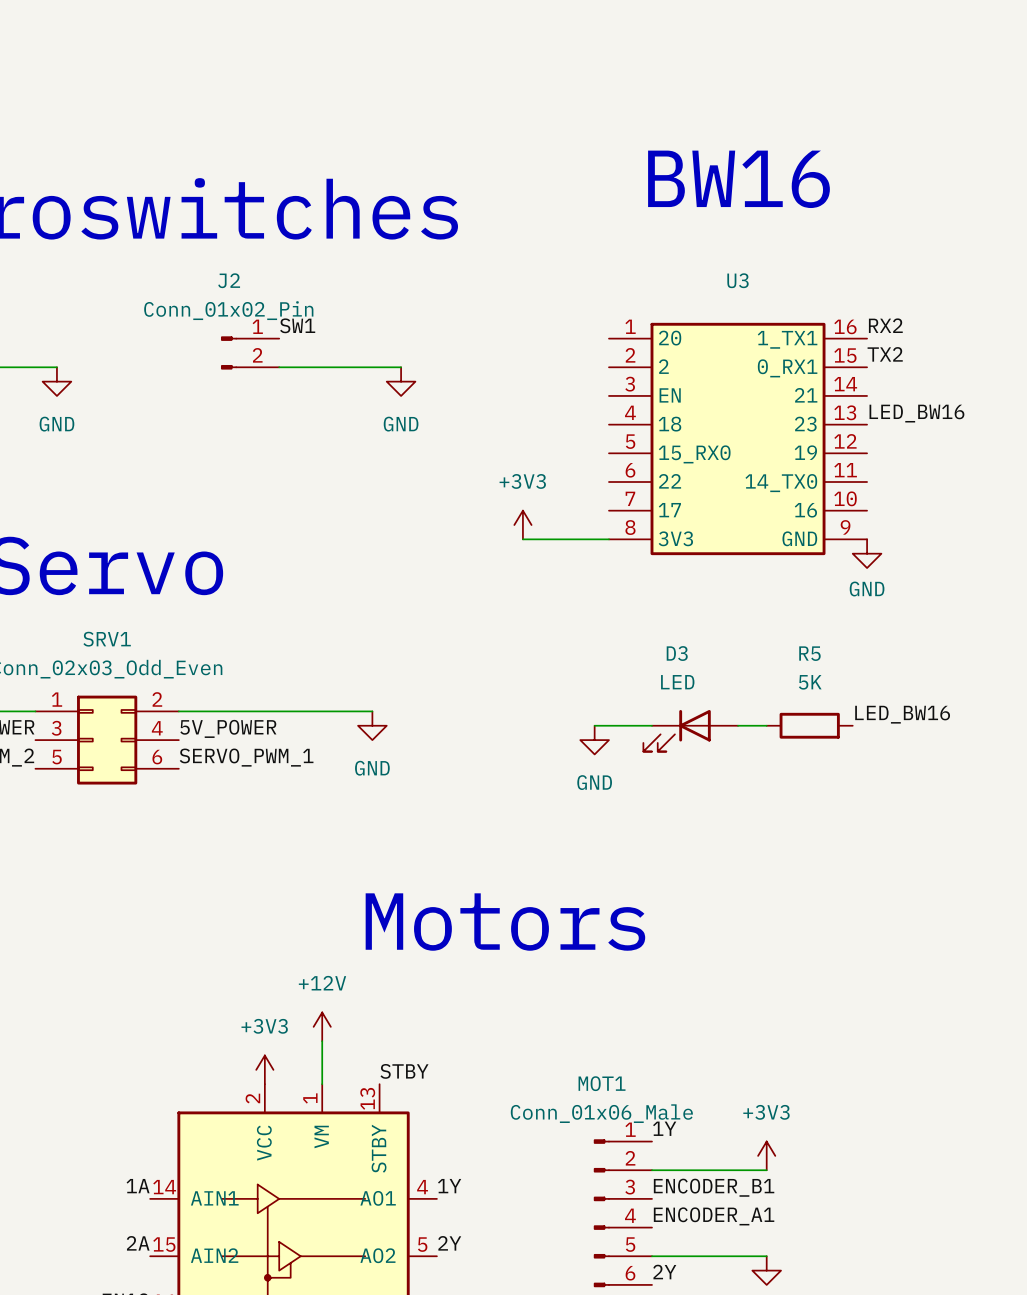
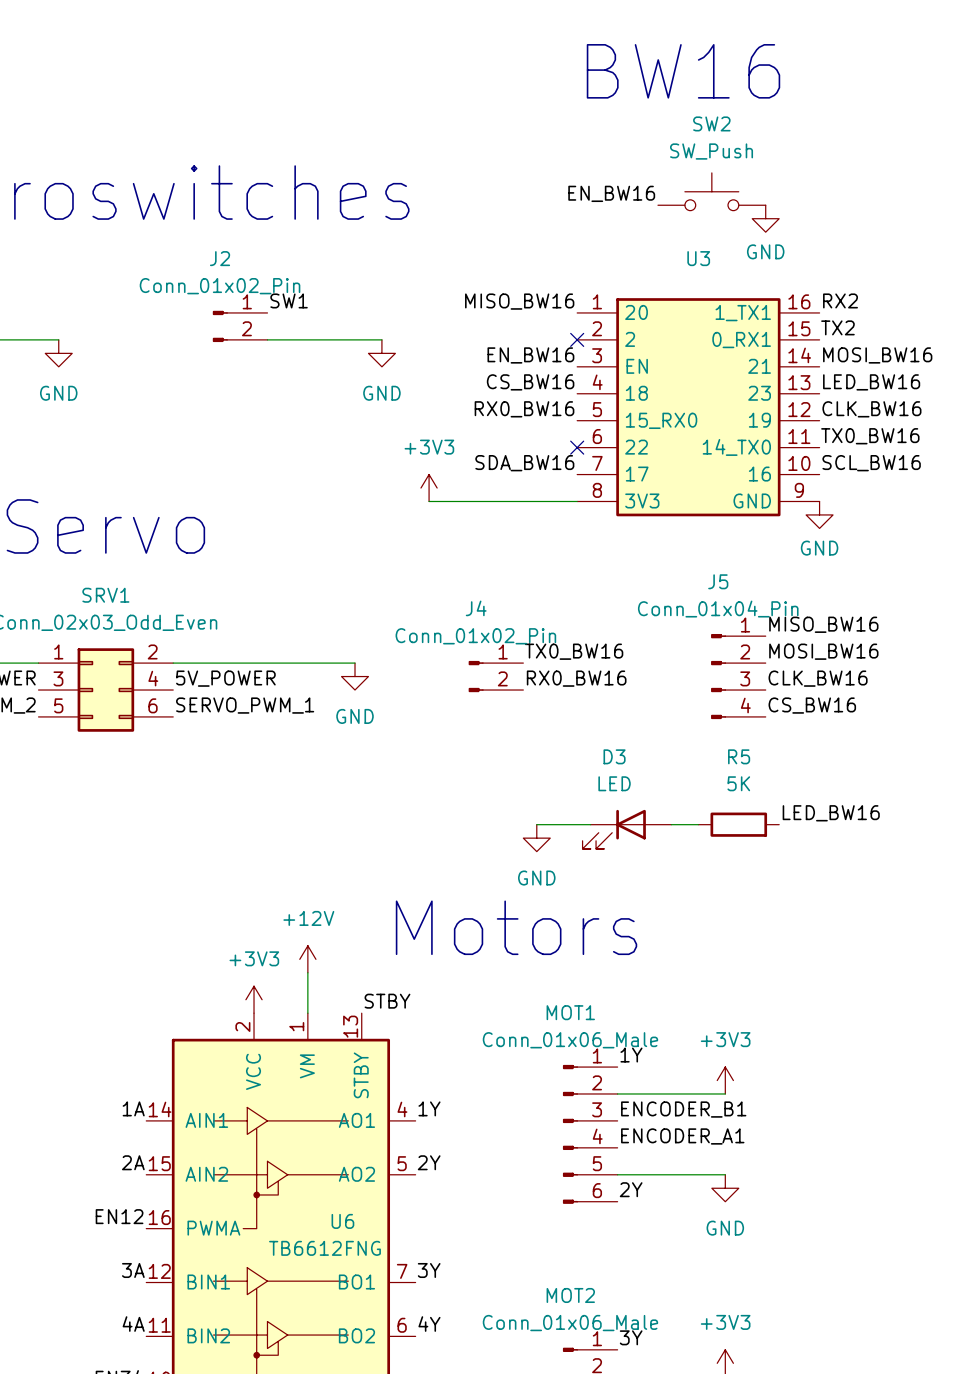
text position: BW16 (738, 179) -> BW16 (683, 71)
SW2: none -> SW_Push (711, 191)
label: none -> EN_BW16 (611, 193)
power symbol: none -> GND (765, 218)
label: none -> MISO_BW16 (519, 301)
no-connect mark: none -> (577, 339)
label: none -> EN_BW16 (530, 355)
label: none -> MOSI_BW16 (877, 355)
label: none -> CS_BW16 (530, 382)
label: none -> RX0_BW16 (524, 409)
label: none -> CLK_BW16 (871, 409)
label: none -> TX0_BW16 (870, 436)
no-connect mark: none -> (577, 447)
label: none -> SDA_BW16 (524, 463)
label: none -> SCL_BW16 (871, 463)
power symbol position: +3V3 (522, 525) -> +3V3 (429, 488)
wire: none -> (429, 501) (496, 501)
label: none -> MISO_BW16 (823, 624)
label: none -> TX0_BW16 (574, 651)
label: none -> MOSI_BW16 (823, 651)
label position: LED_BW16 (902, 714) -> LED_BW16 (831, 813)
J4: none -> Conn_01x02_Pin (495, 676)
wire: (594, 725) (651, 725) -> (536, 824) (590, 824)
wire: (738, 725) (766, 725) -> (671, 824) (698, 824)
J5: none -> Conn_01x04_Pin (738, 676)
R5 position: (809, 725) -> (738, 824)
label: none -> RX0_BW16 (576, 678)
label: none -> CLK_BW16 (818, 678)
D3 position: (690, 730) -> (627, 829)
power symbol position: GND (594, 740) -> GND (536, 838)
label: none -> CS_BW16 (812, 705)
text position: Motors (505, 922) -> Motors (516, 927)

